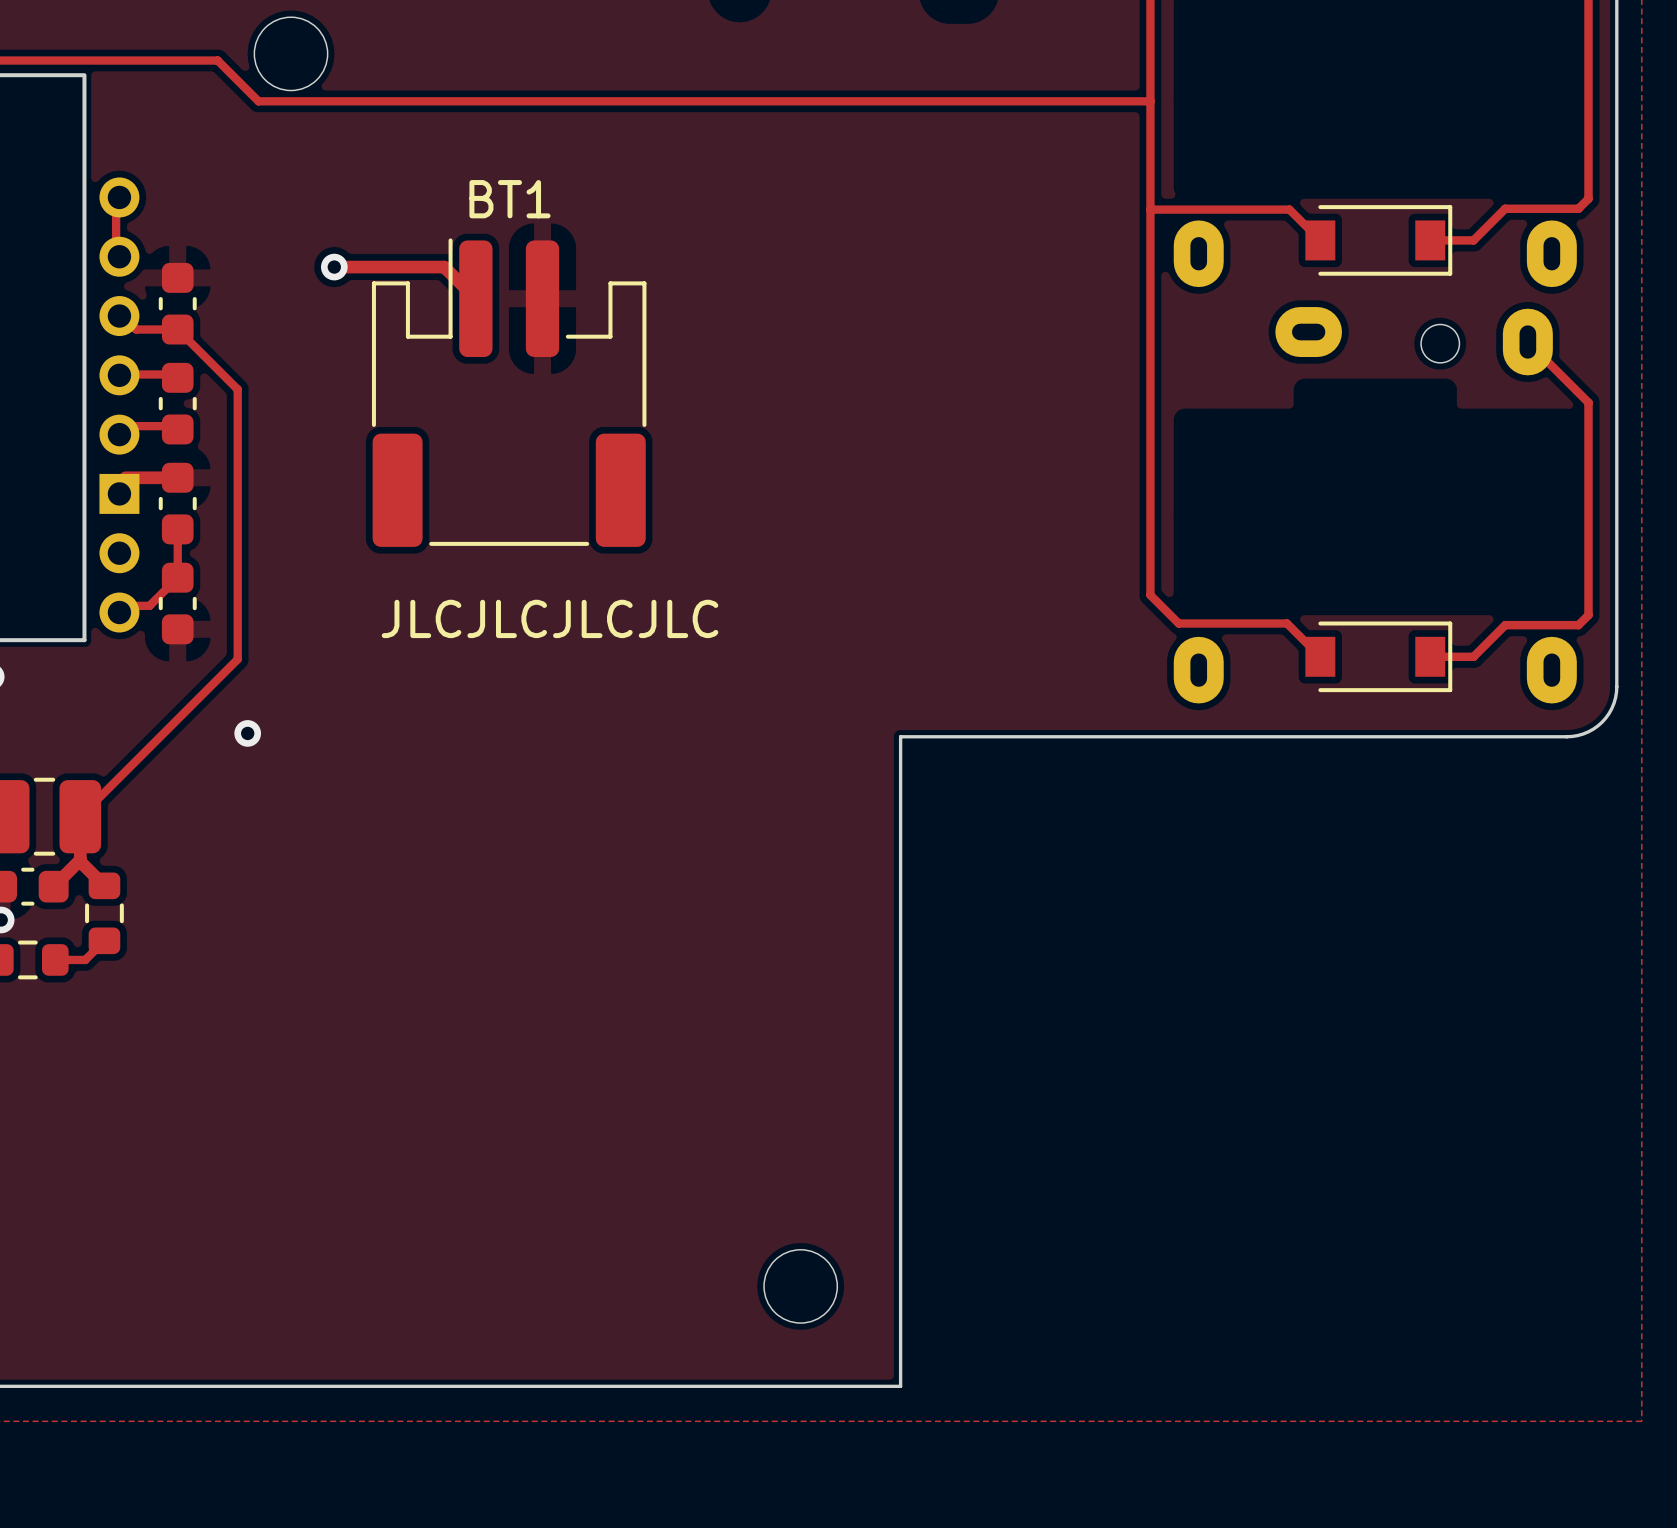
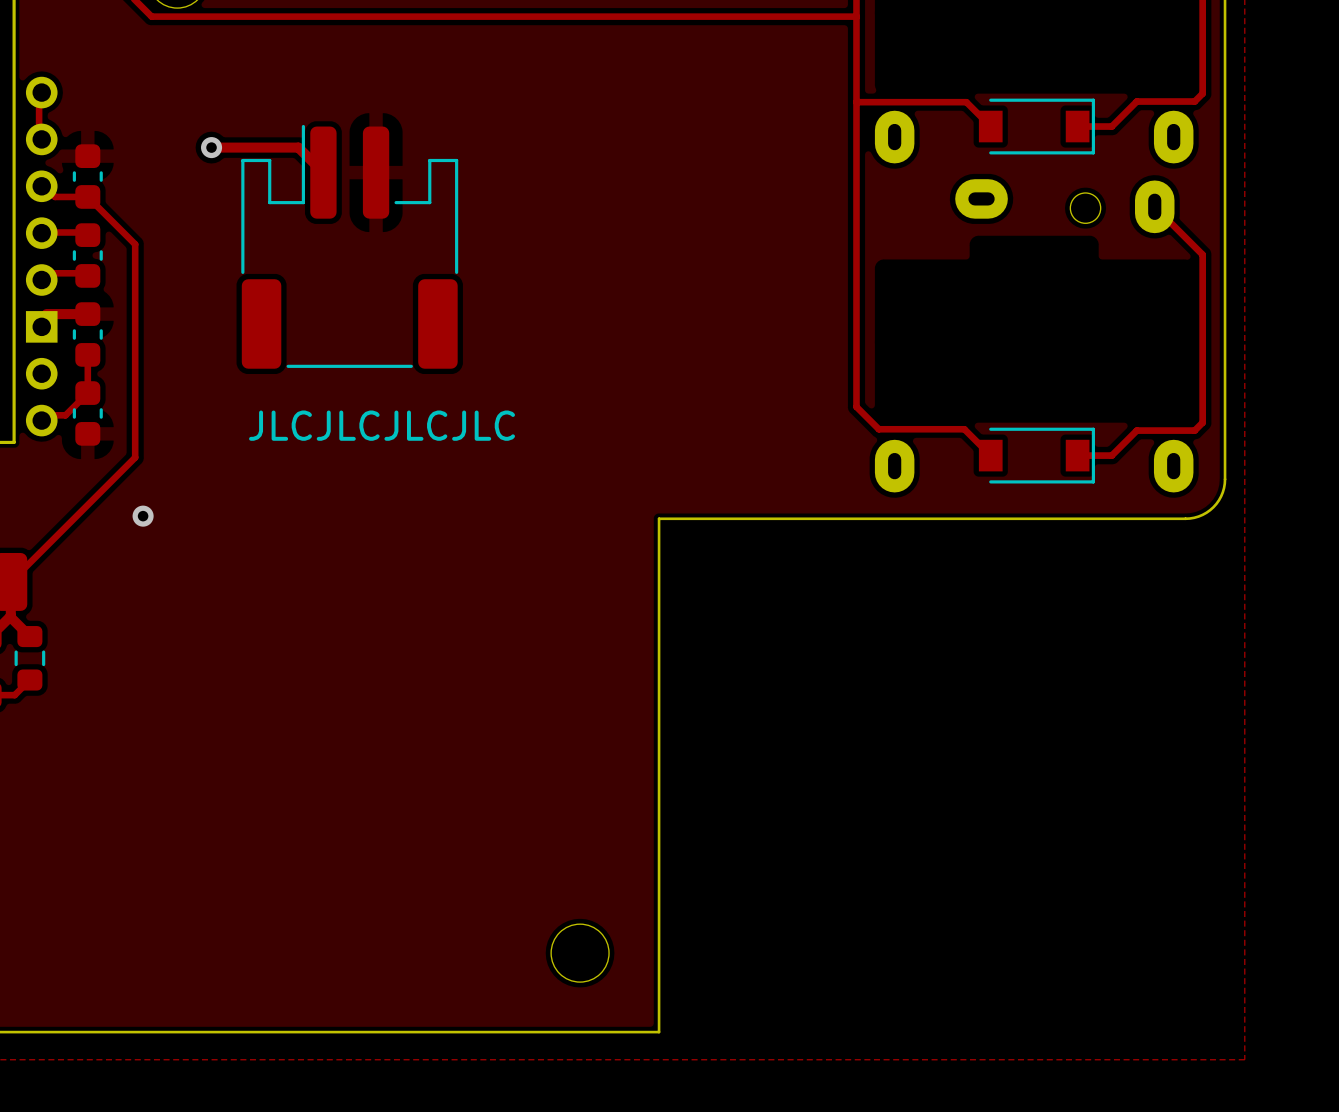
BT1 name: BT1 (509, 199) -> none

